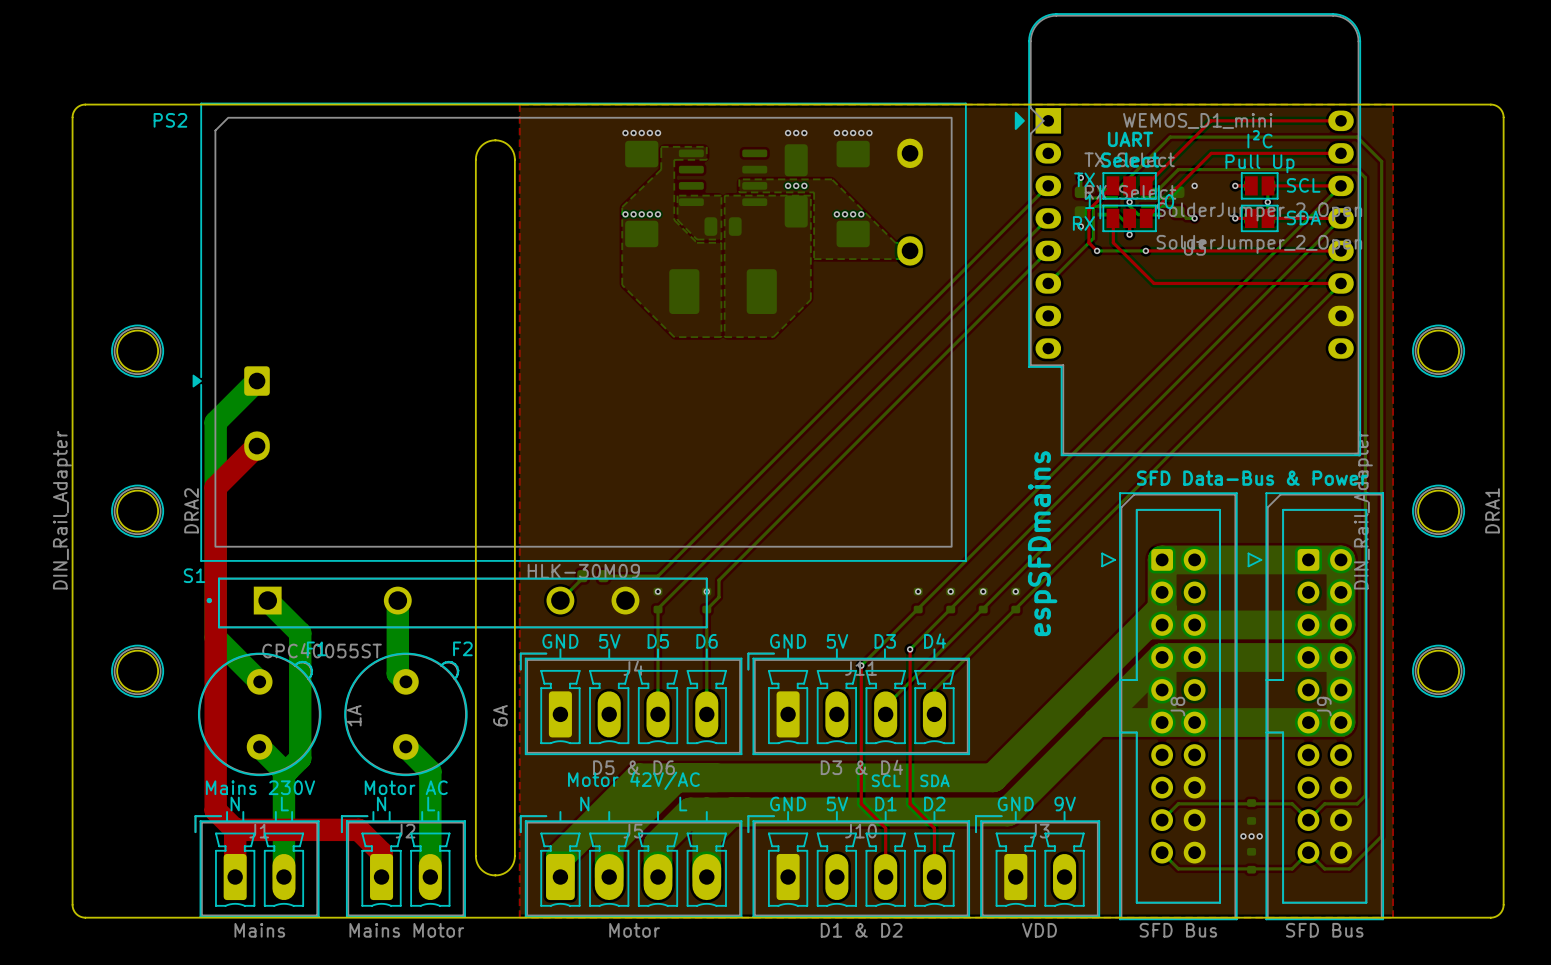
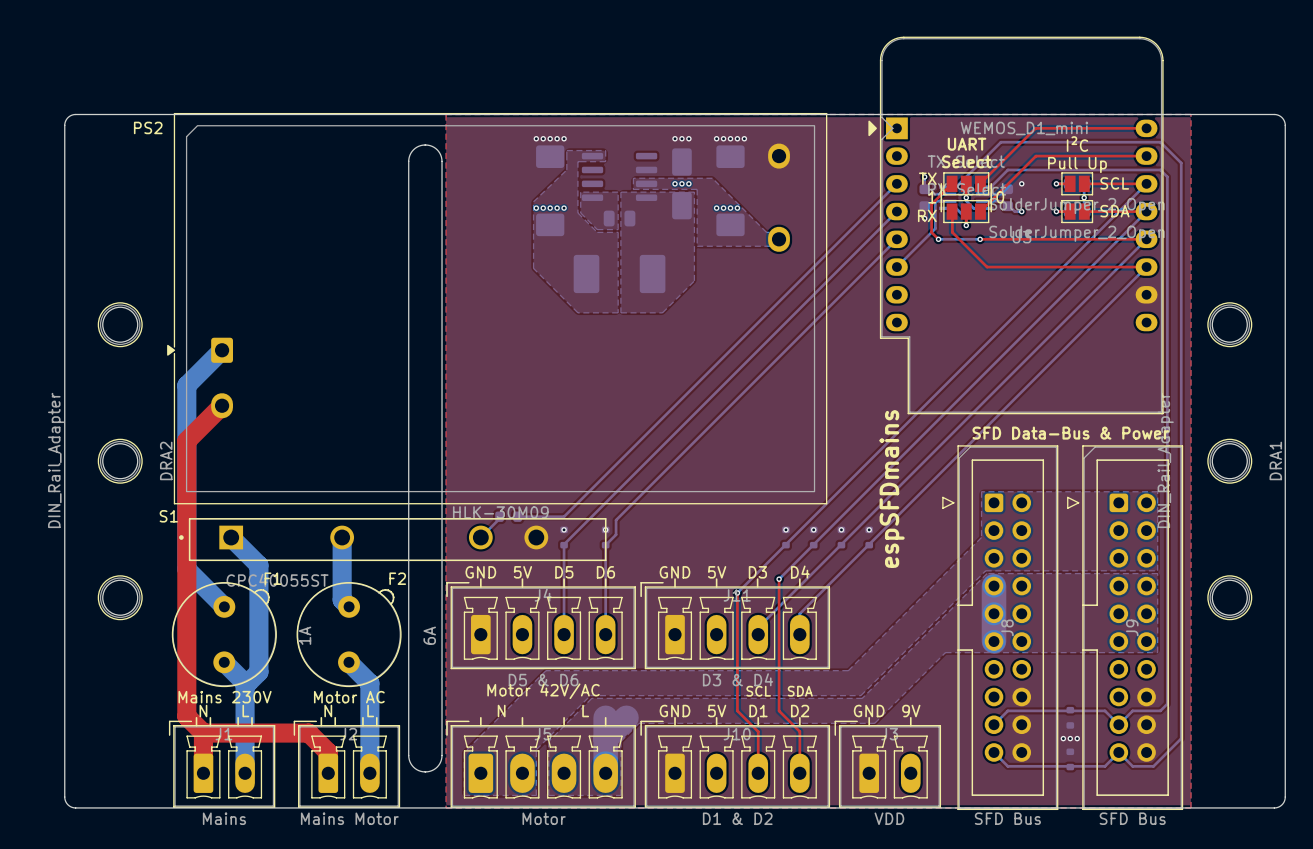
bottom zone outline: none -> (981, 491) (1157, 491) (1157, 570) (985, 570) (860, 695) (590, 695) (536, 749) (536, 795) (464, 795) (464, 752) (546, 670) (848, 670) (981, 537) (981, 491)
bottom track: (1162, 608) (992, 777) (639, 777) (560, 856) (560, 877) -> none
bottom track: (1145, 624) (1341, 624) (1341, 559) (1162, 559) (1162, 624) -> none
bottom zone outline: none -> (987, 573) (1157, 573) (1157, 652) (945, 652) (874, 723) (638, 723) (620, 741) (620, 795) (548, 795) (548, 741) (591, 698) (862, 698) (987, 573)
bottom track: (1097, 722) (1341, 722) (1341, 657) (1162, 657) (1007, 811) (690, 811) (657, 844) (657, 877) -> none
bottom track: (675, 777) (609, 844) (609, 877) -> none

